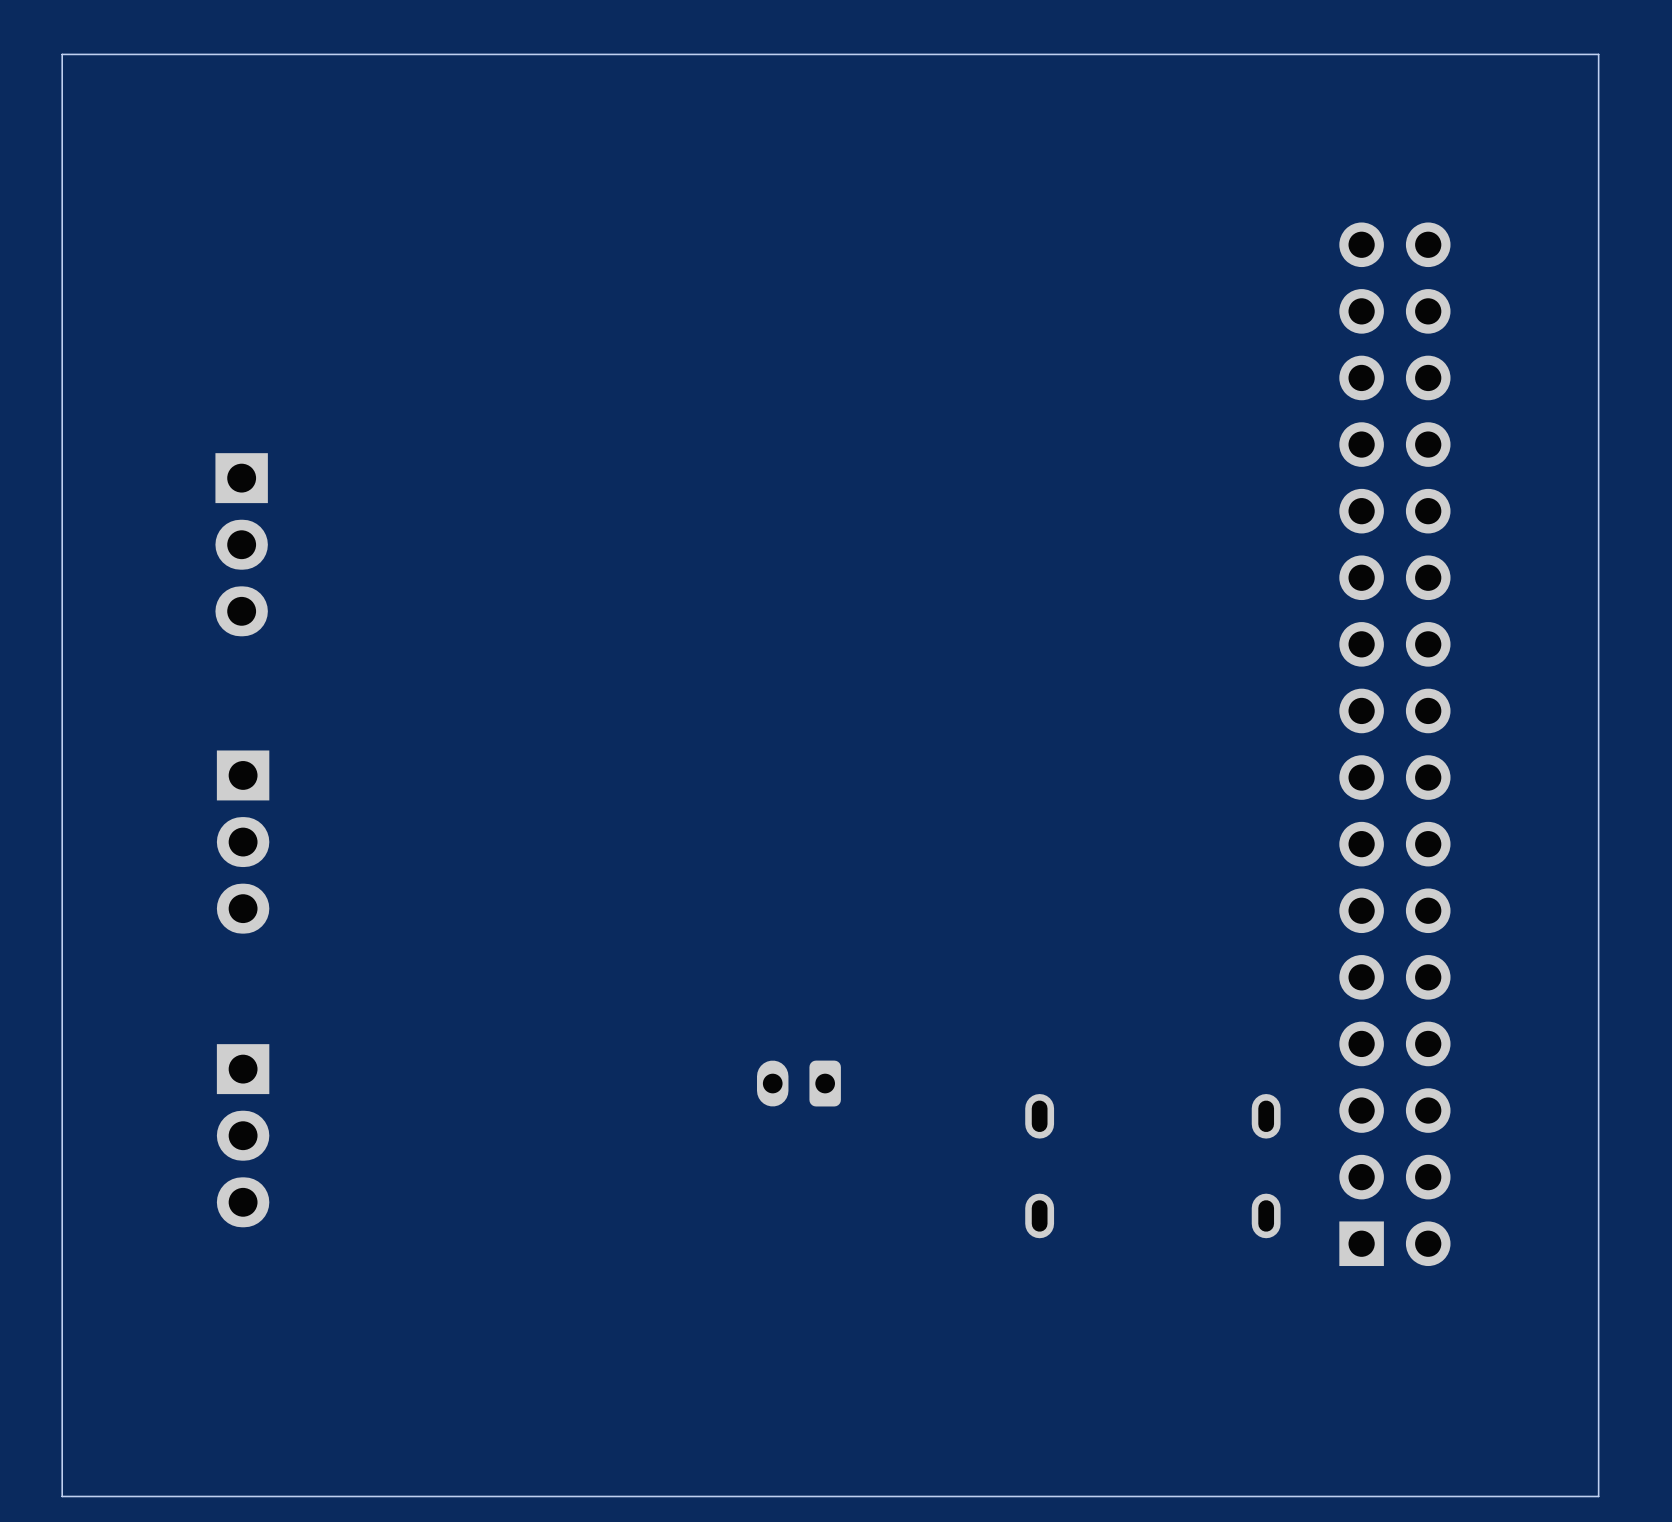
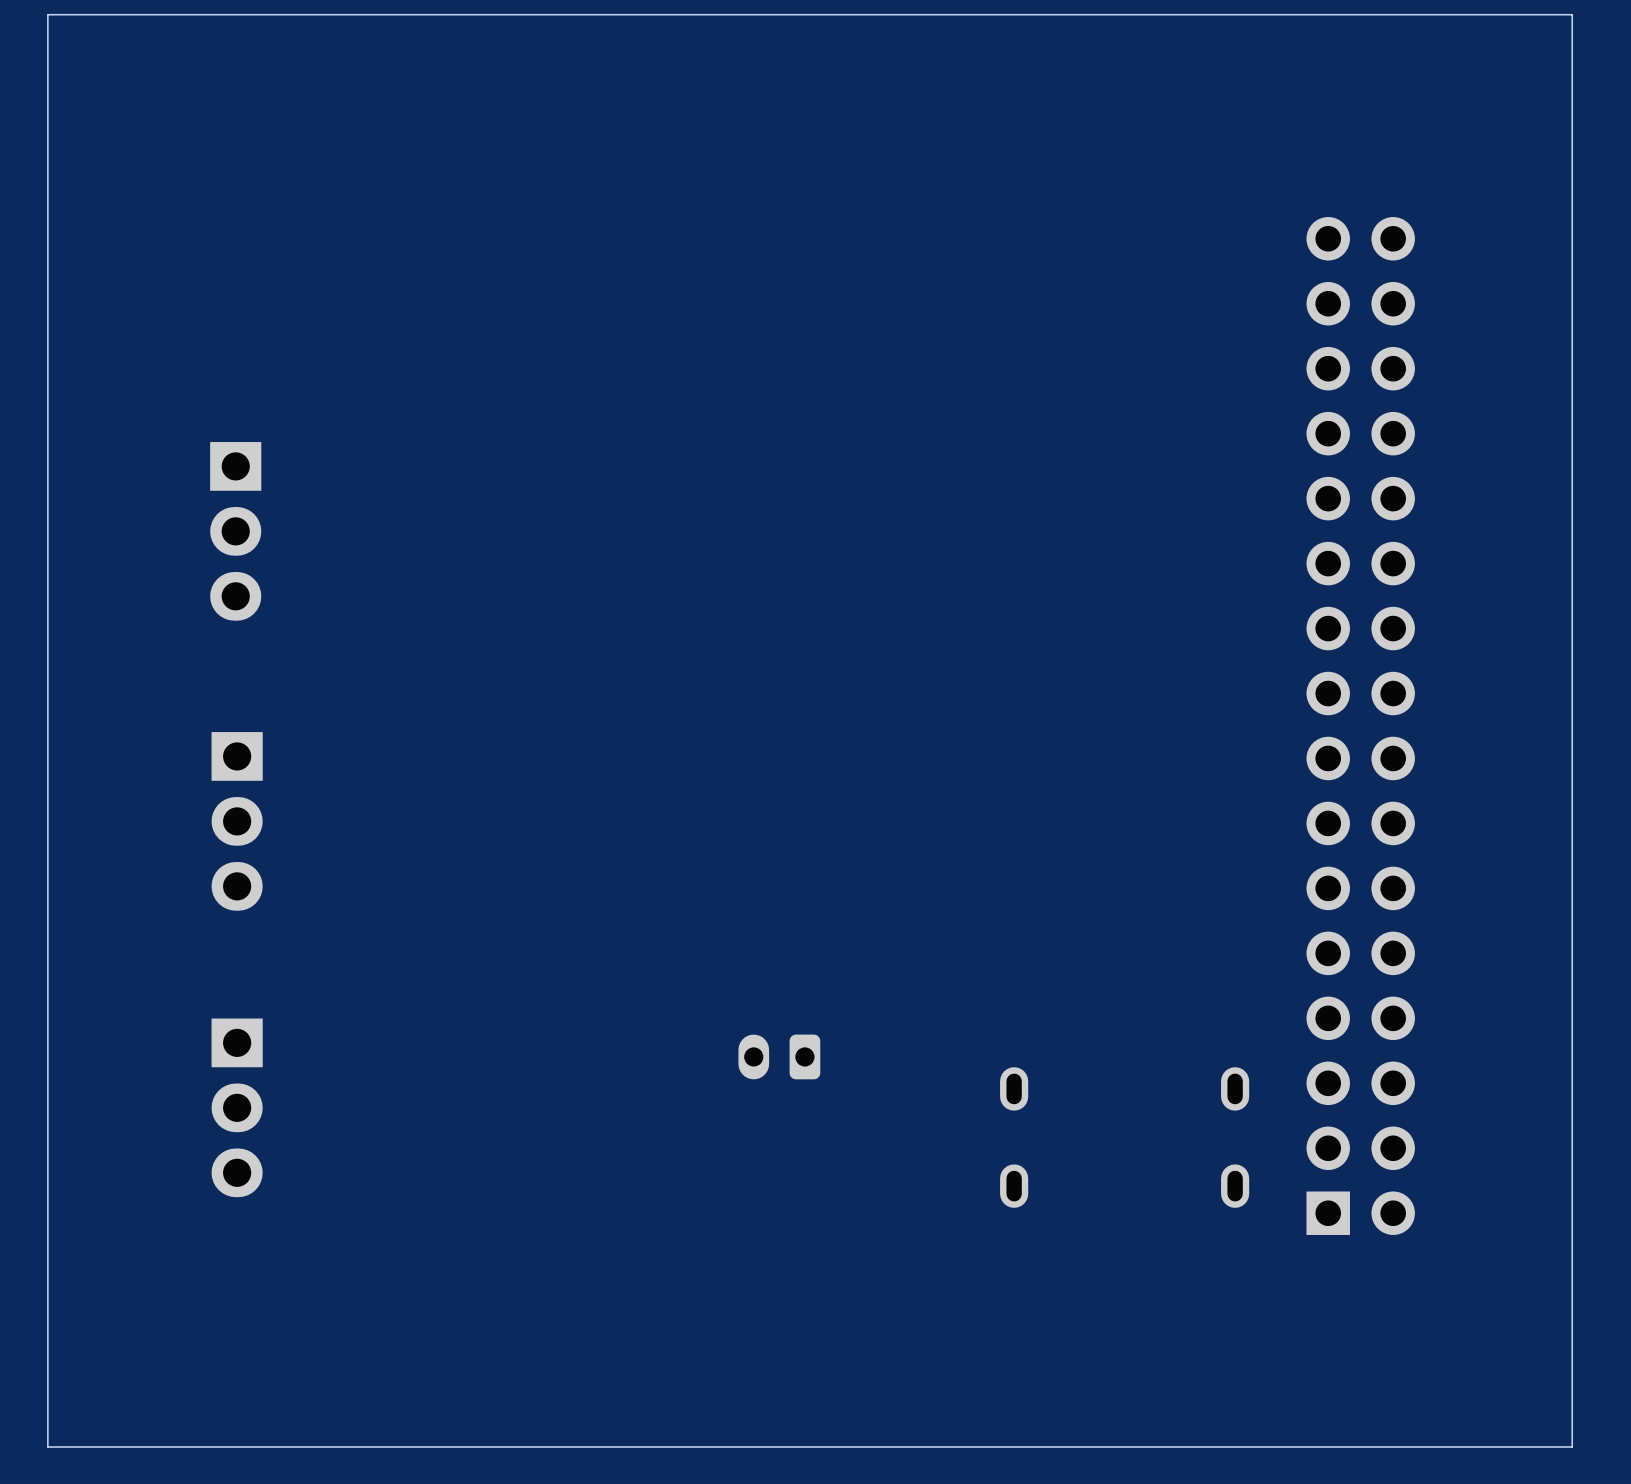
board edge: (1598, 54) (62, 54) (62, 1496) (1598, 1496) (1598, 54) -> (1572, 14) (1572, 1446) (47, 1446) (47, 14) (1572, 14)

